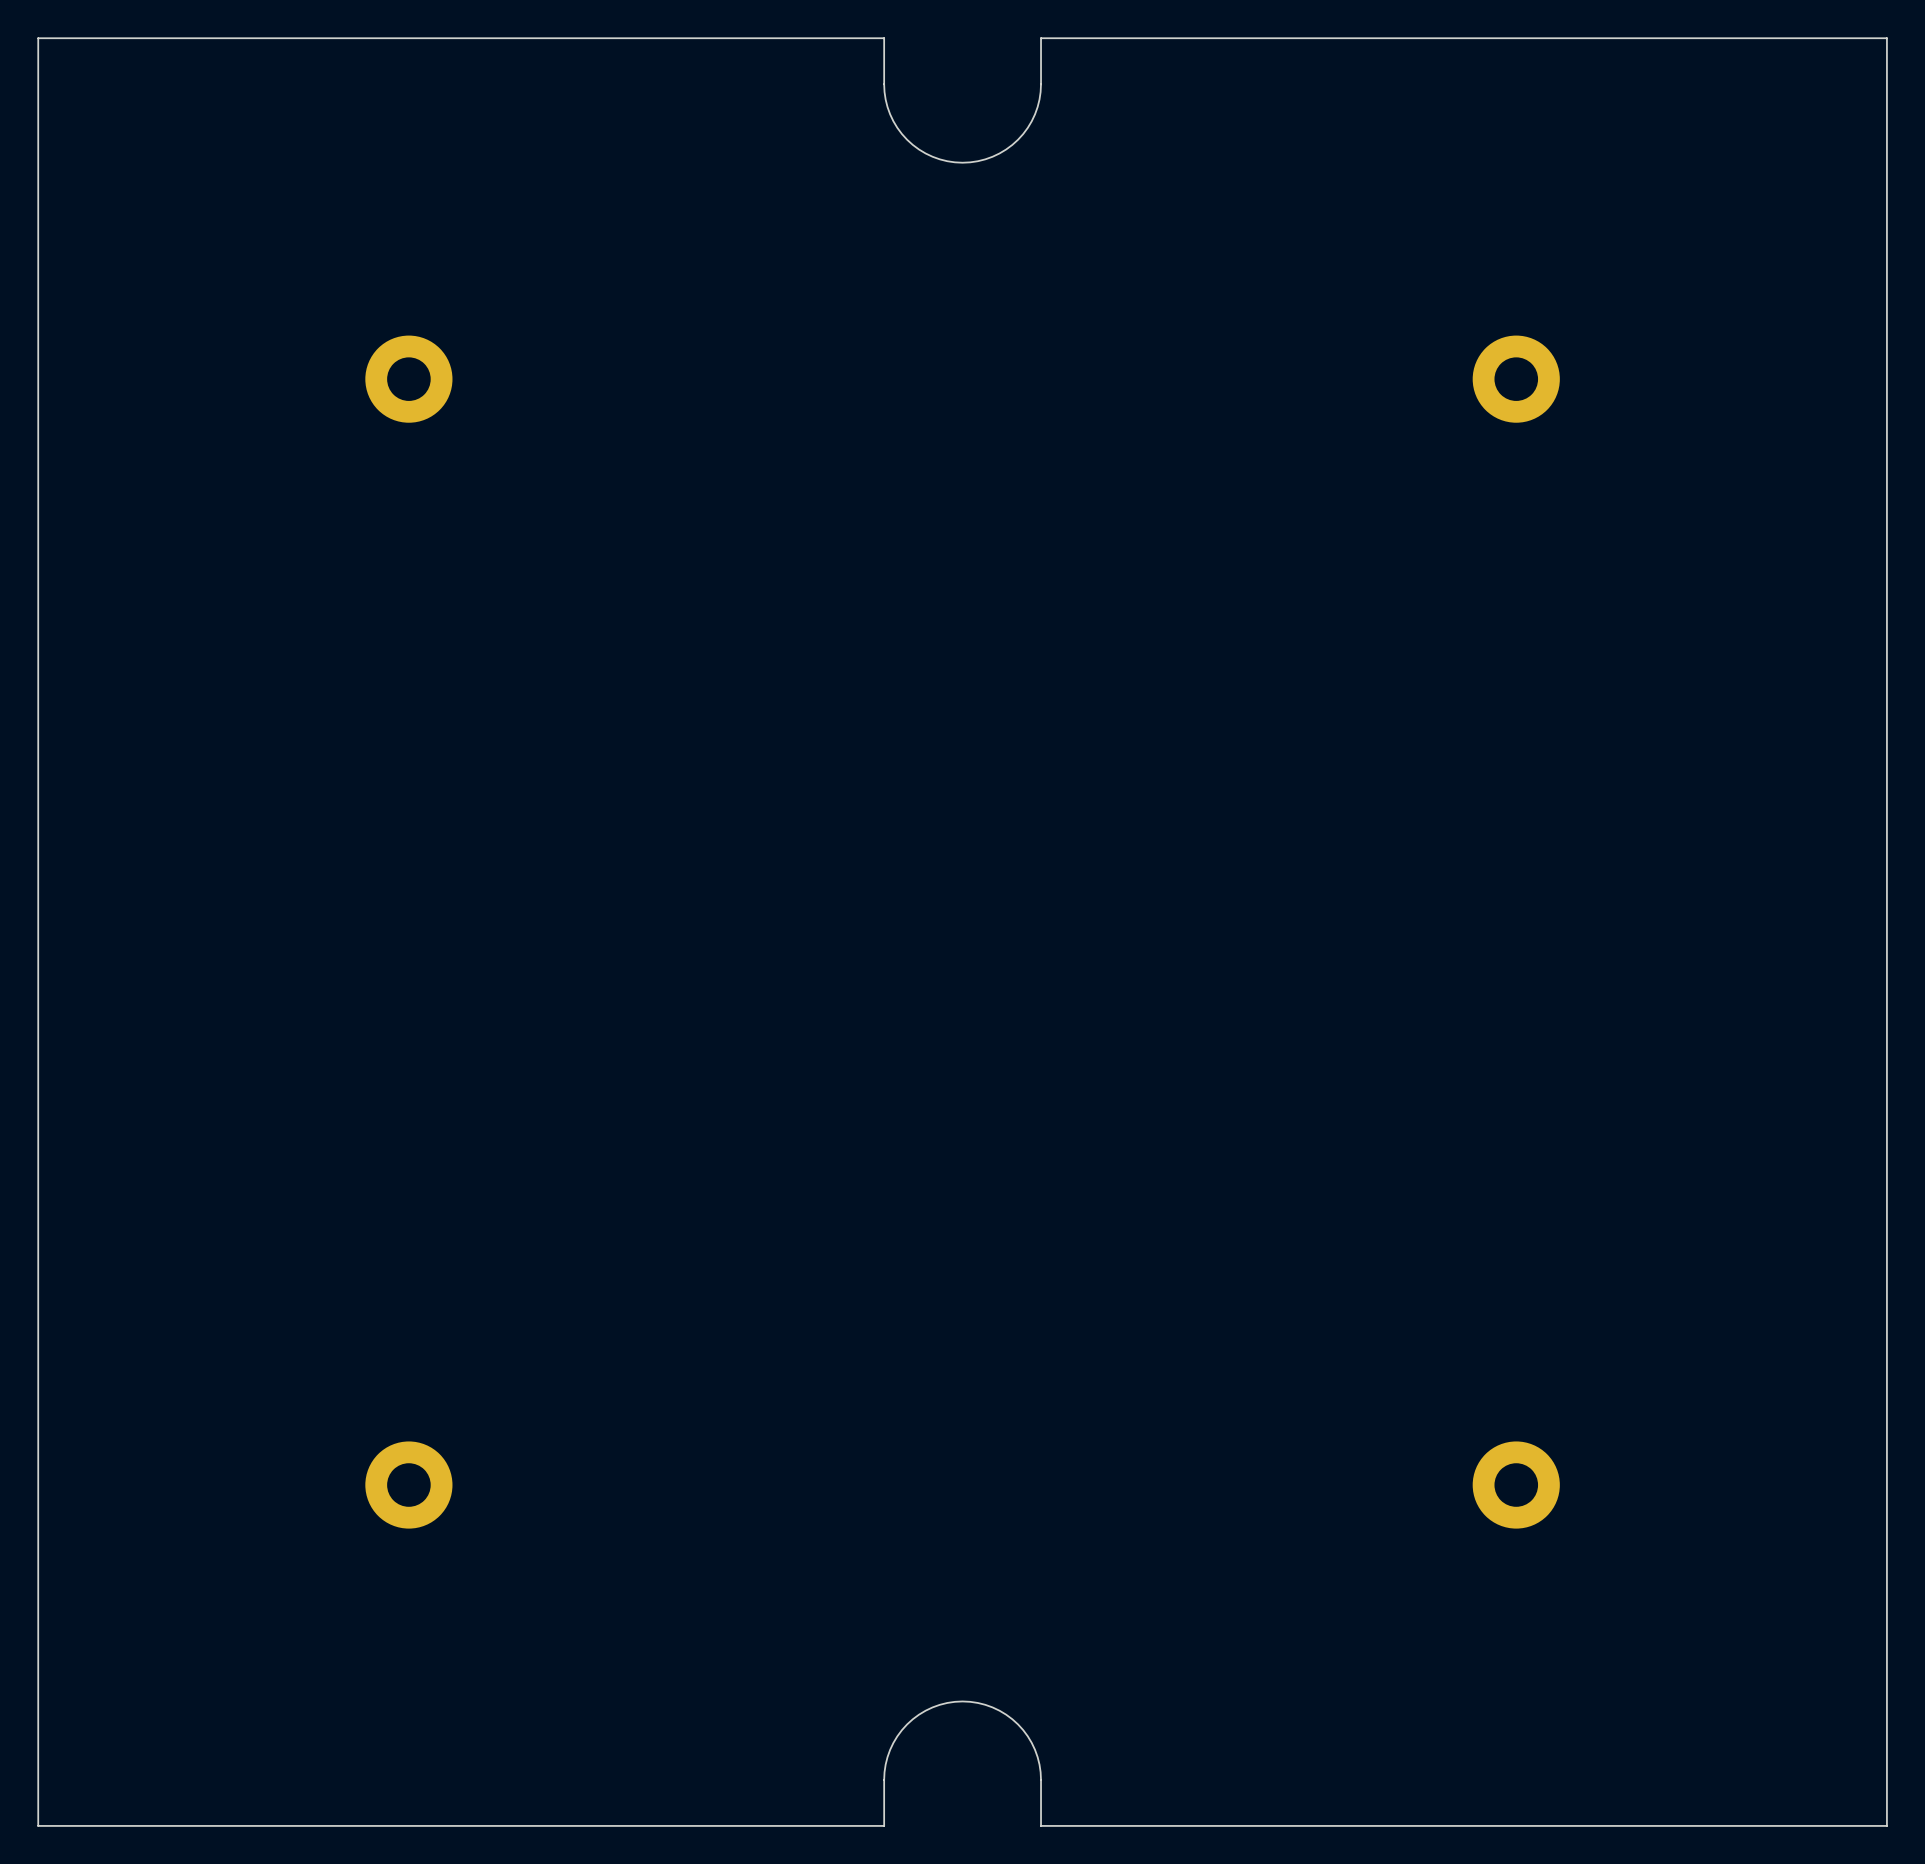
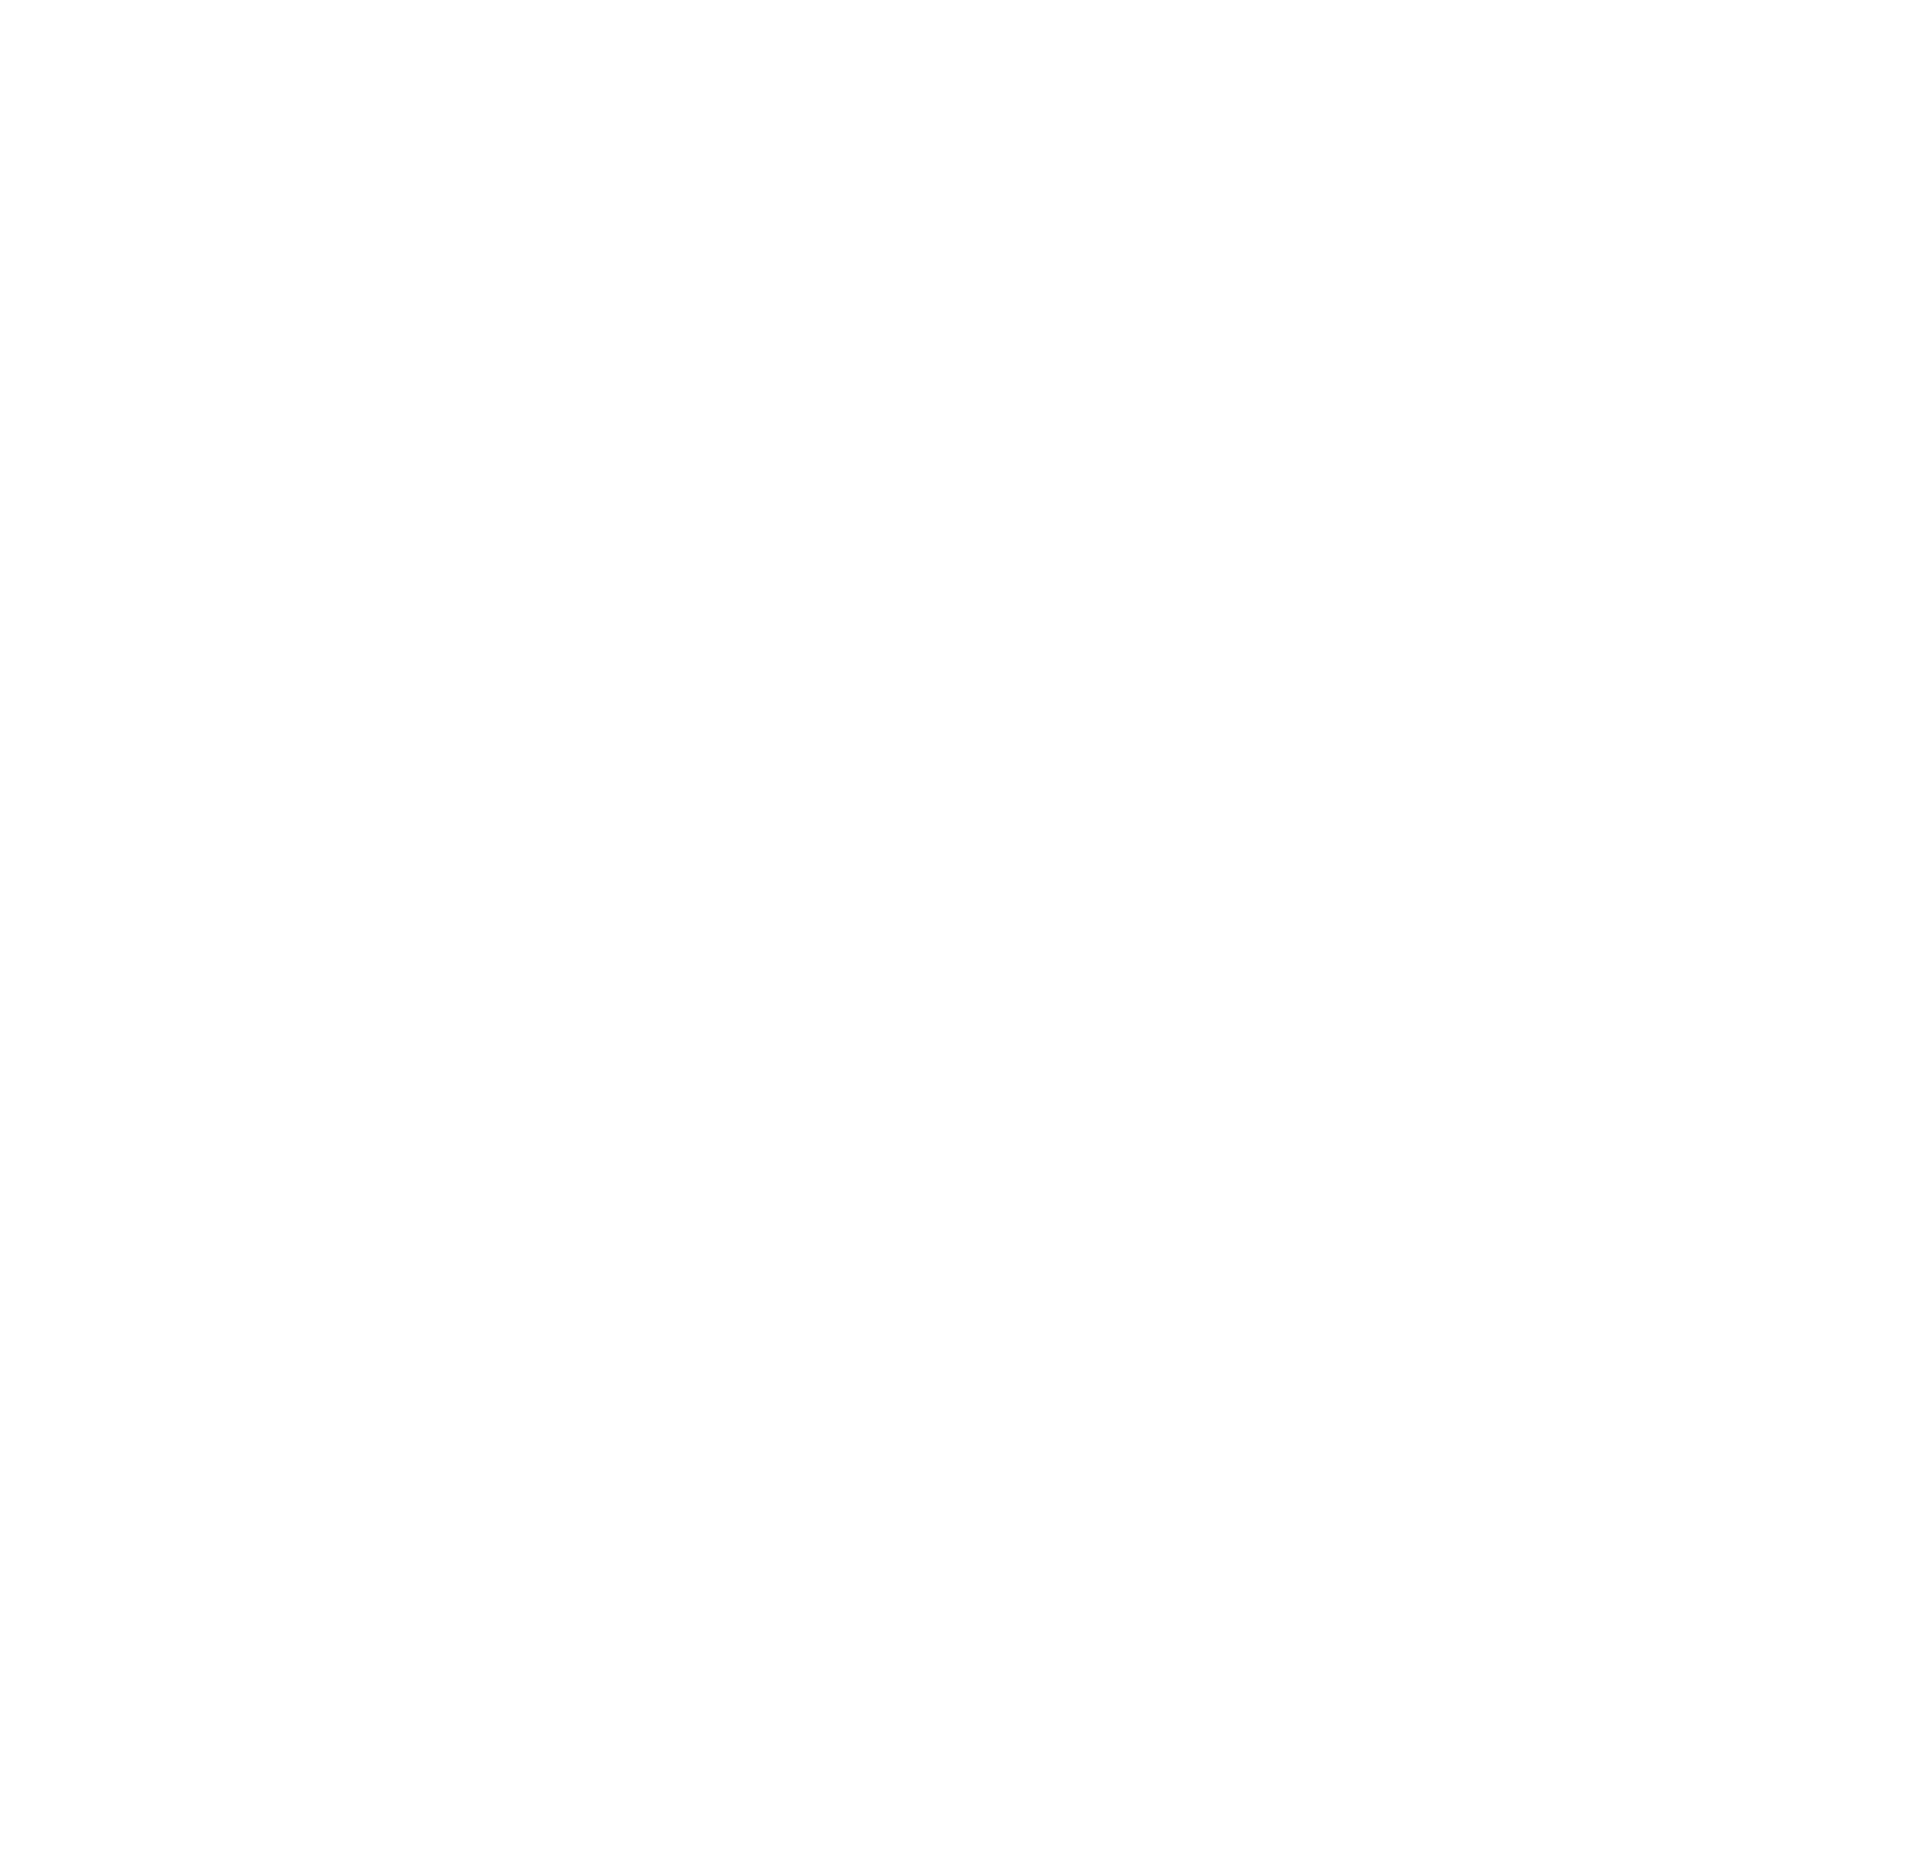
board edge: (38, 38) (884, 38) (884, 91) (890, 114) (897, 127) (907, 139) (925, 153) (939, 159) (962, 162) (985, 159) (999, 153) (1018, 139) (1027, 127) (1035, 114) (1040, 91) (1041, 38) (1886, 38) (1886, 1825) (1041, 1825) (1040, 1772) (1035, 1749) (1027, 1736) (1018, 1724) (999, 1710) (977, 1702) (962, 1701) (947, 1702) (925, 1710) (907, 1724) (897, 1736) (890, 1749) (884, 1772) (884, 1825) (38, 1825) (38, 38) -> none
part: (408, 379) -> none
part: (1516, 379) -> none
part: (408, 1485) -> none
part: (1516, 1485) -> none

